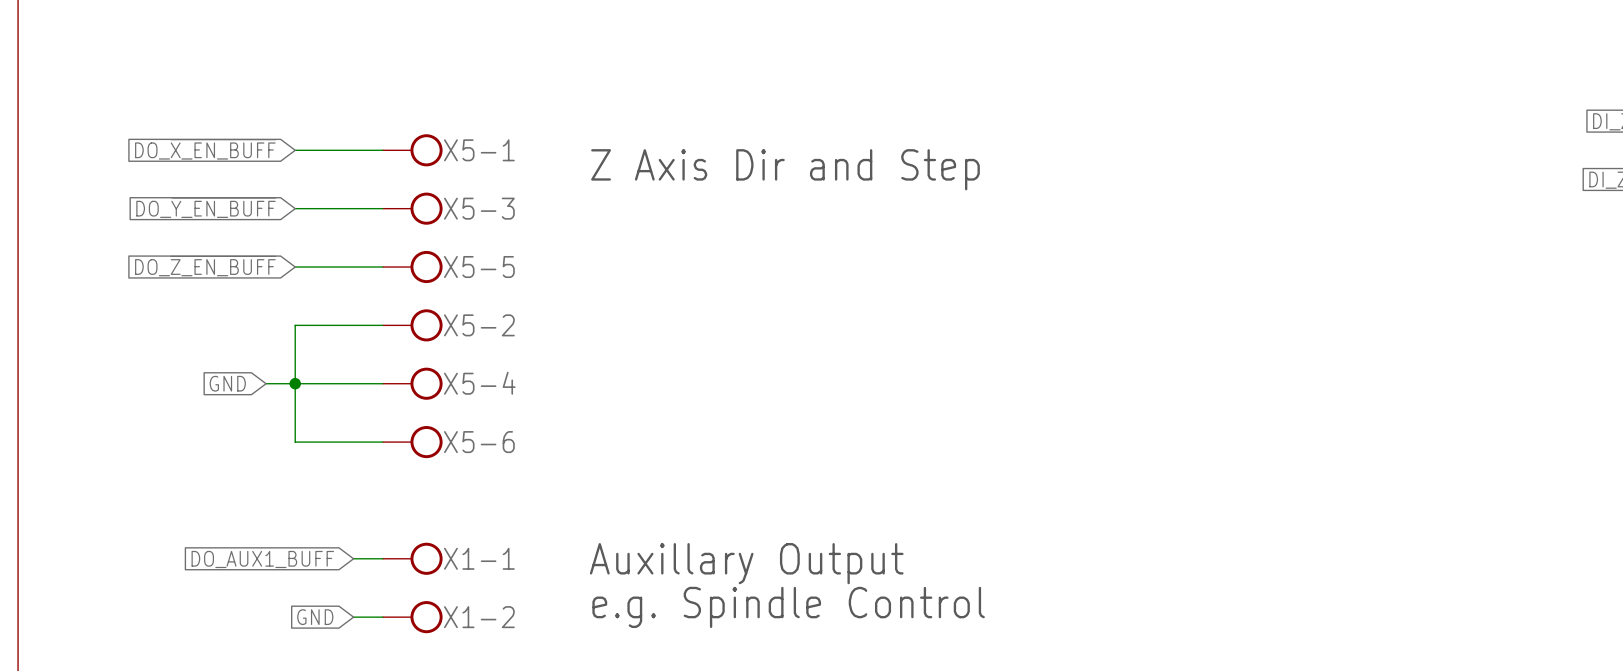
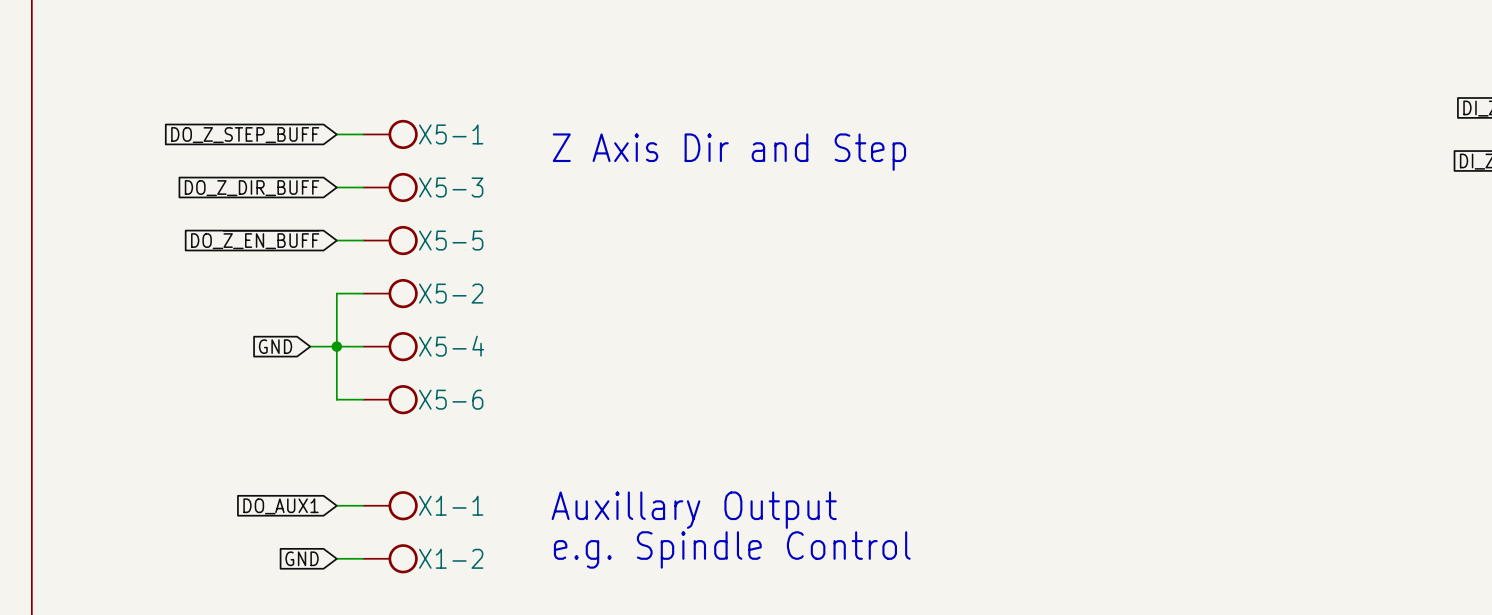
global label: DO_~{X_EN_BUFF} (205, 149) -> DO_Z_STEP_BUFF (245, 135)
wire: (295, 150) (353, 150) -> none
global label: DO_~{Y_EN_BUFF} (206, 207) -> DO_Z_DIR_BUFF (252, 188)
wire: (295, 208) (353, 208) -> none
global label position: DO_~{Z_EN_BUFF} (205, 266) -> DO_~{Z_EN_BUFF} (255, 239)
wire: (295, 267) (353, 267) -> none
wire: (353, 325) (295, 325) (295, 442) (353, 442) -> (336, 293) (336, 399)
global label position: GND (227, 383) -> GND (275, 346)
wire: (266, 383) (324, 383) -> none
junction position: (295, 383) -> (336, 346)
global label: DO_AUX1_BUFF (262, 559) -> DO_AUX1 (281, 506)

